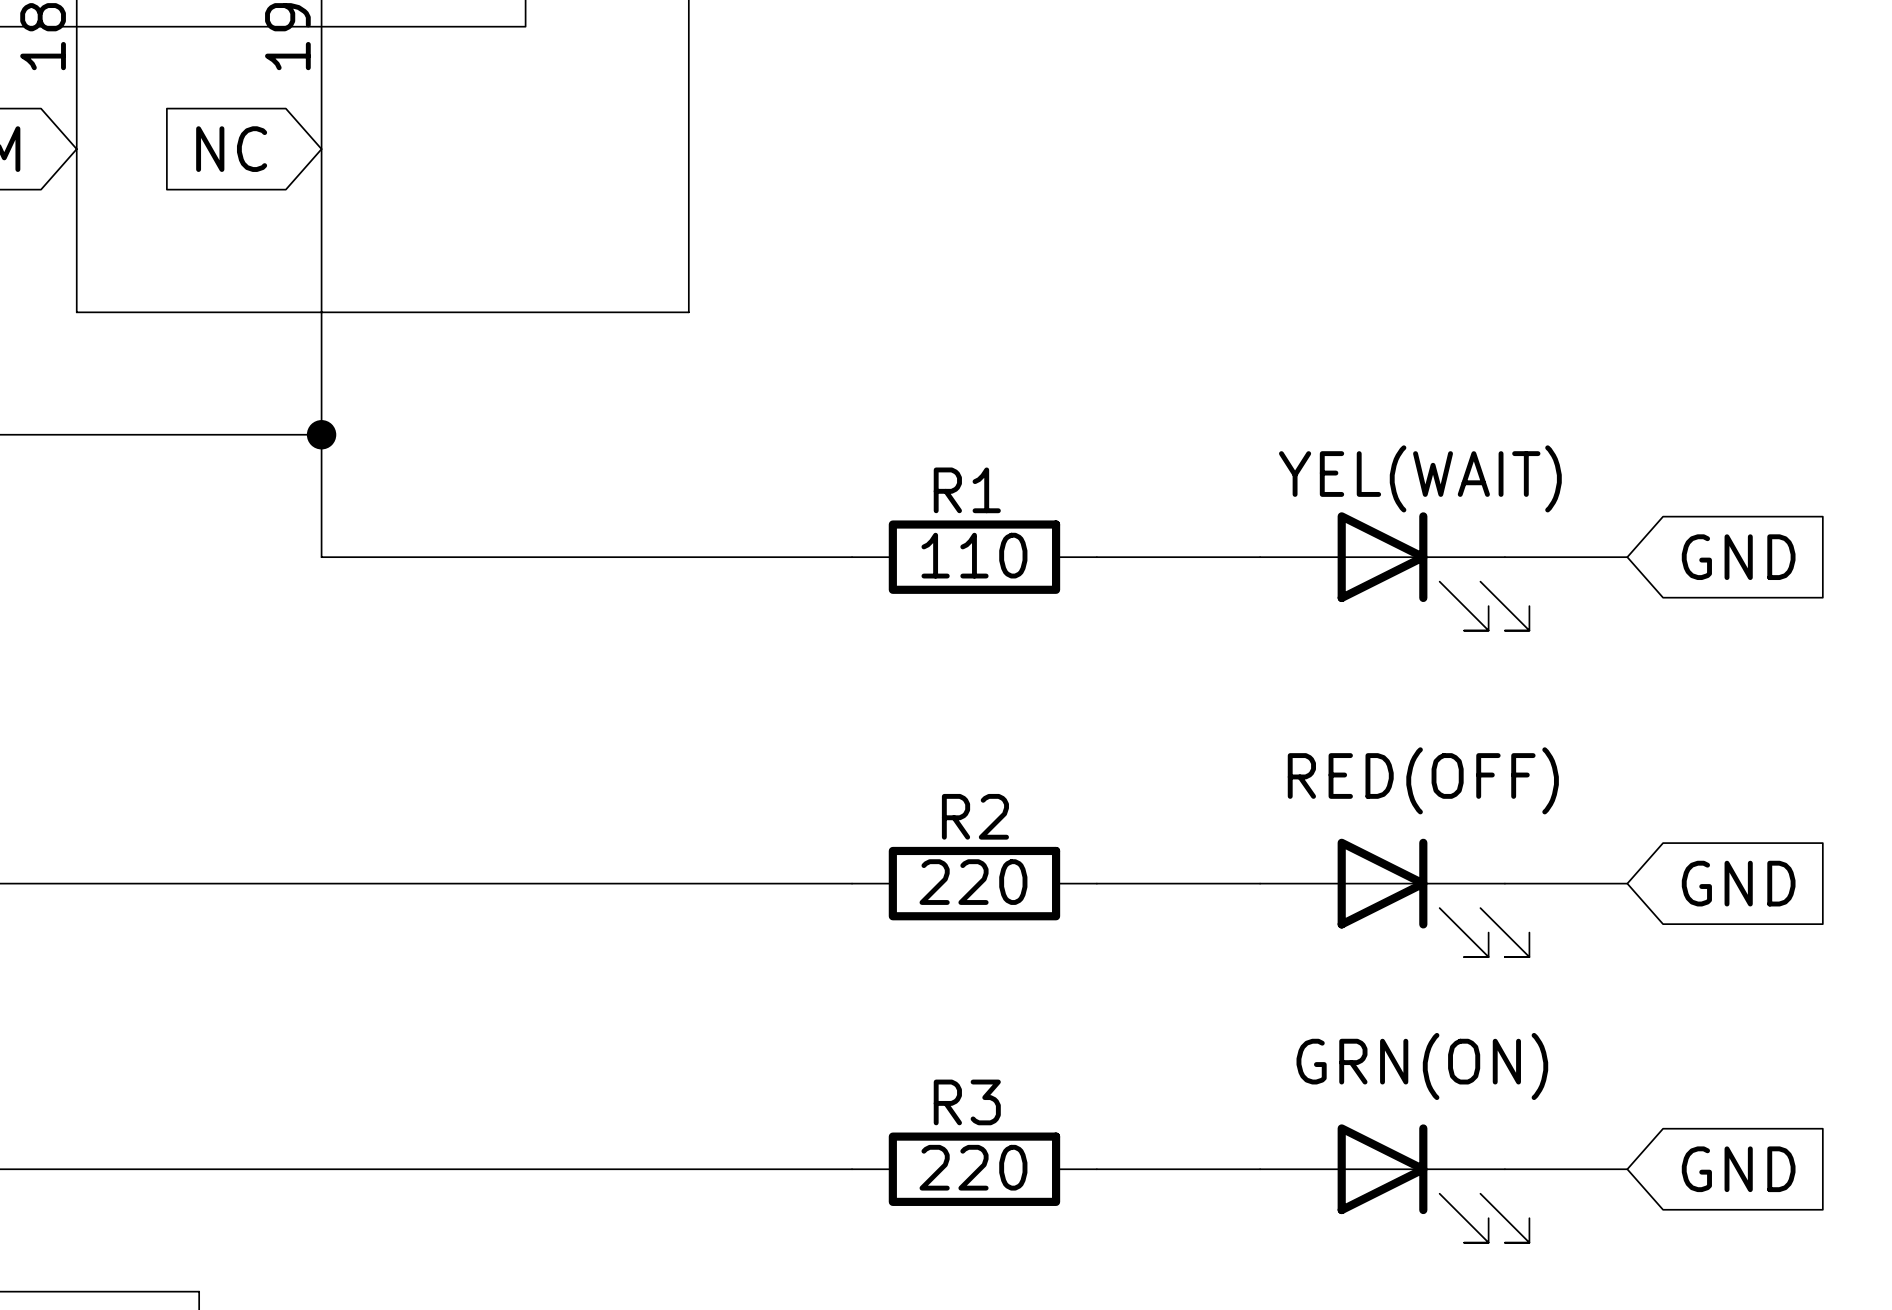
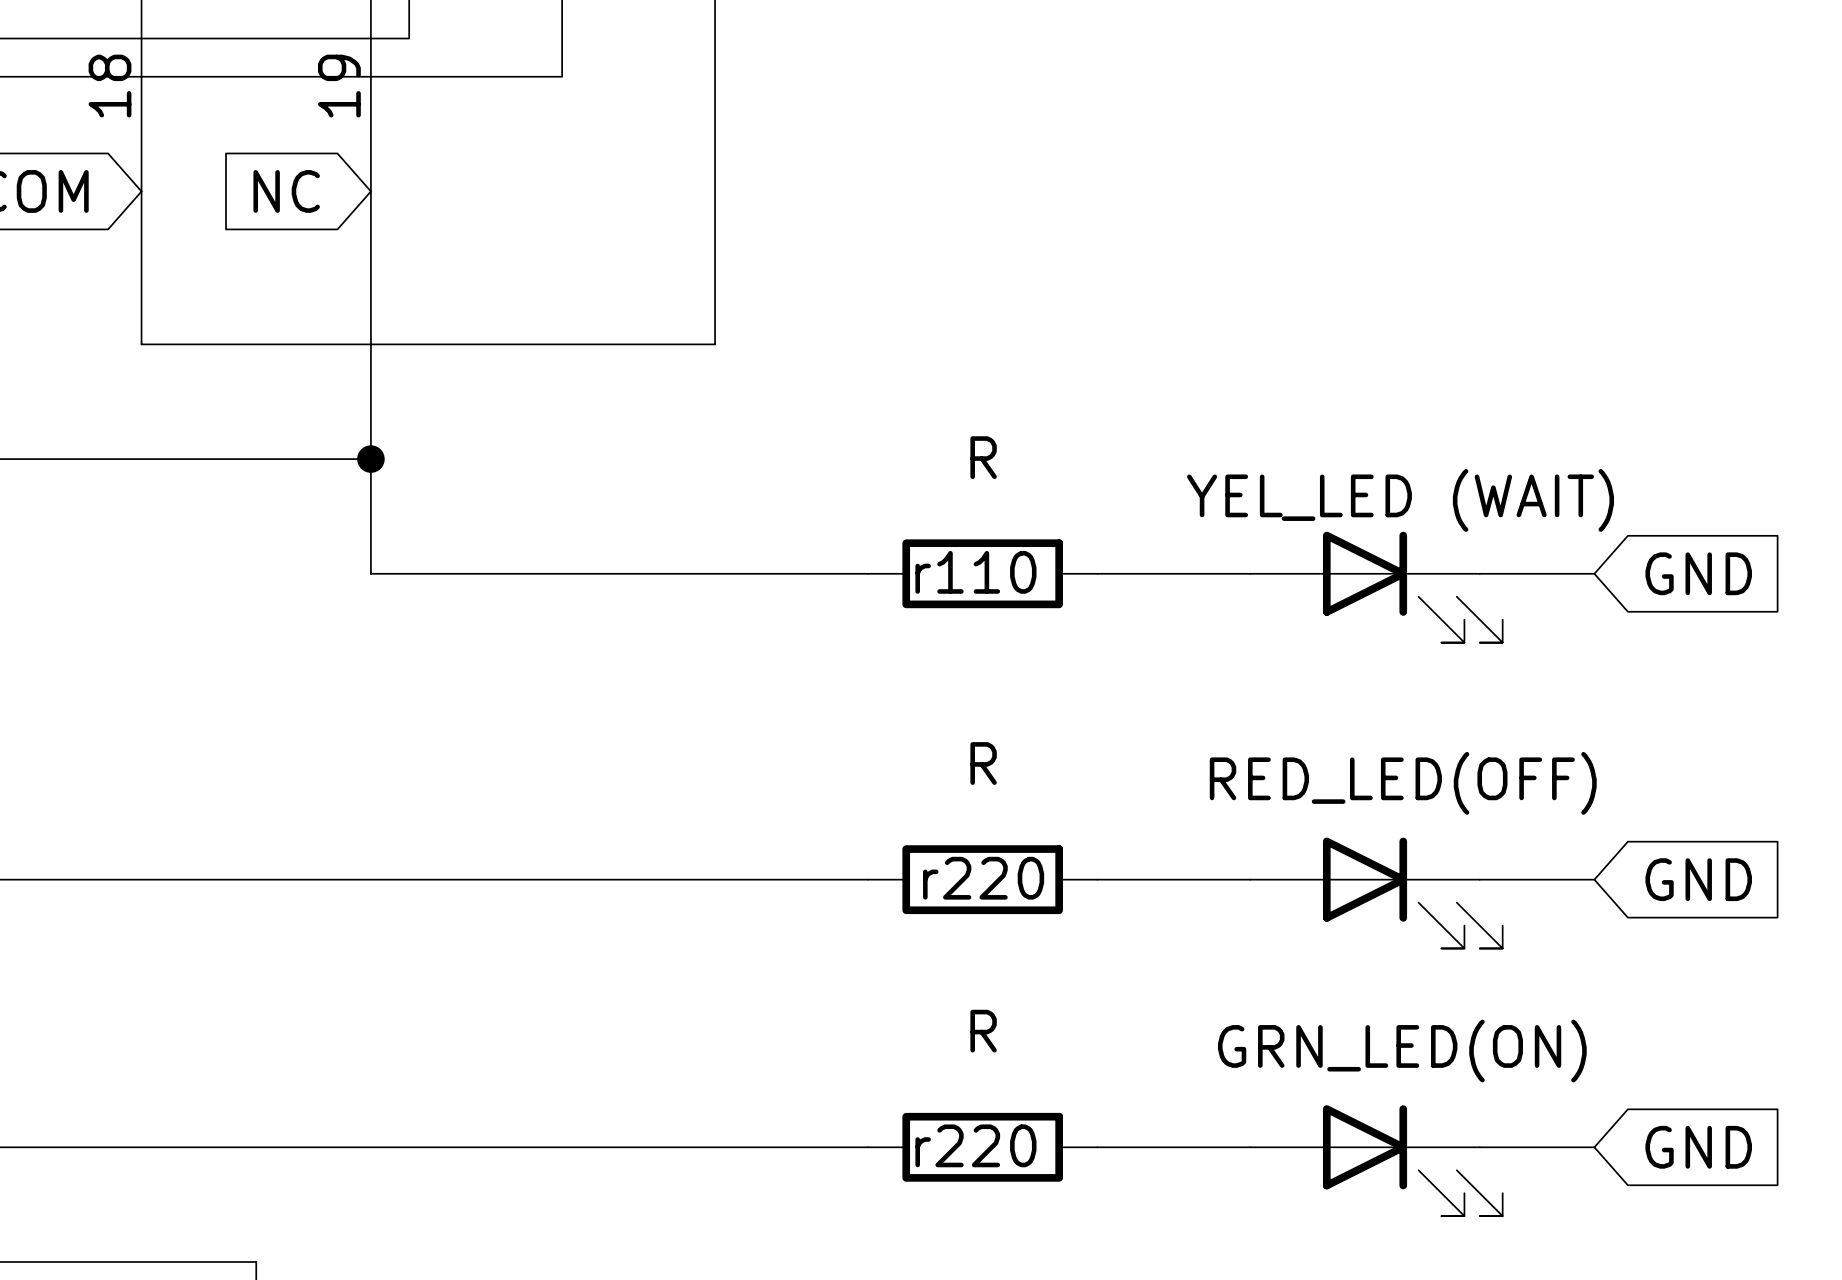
part value: YEL(WAIT) (1420, 478) -> YEL_LED (WAIT) (1400, 500)
R1 name: R1 (967, 490) -> r110 (975, 572)
R1 value: 110 (974, 555) -> R (983, 457)
part value: RED(OFF) (1423, 780) -> RED_LED(OFF) (1403, 783)
R2 name: R2 (975, 816) -> r220 (983, 878)
R2 value: 220 (973, 882) -> R (983, 763)
part value: GRN(ON) (1422, 1066) -> GRN_LED(ON) (1402, 1051)
R3 name: R3 (967, 1102) -> r220 (975, 1145)
R3 value: 220 (973, 1167) -> R (983, 1031)

